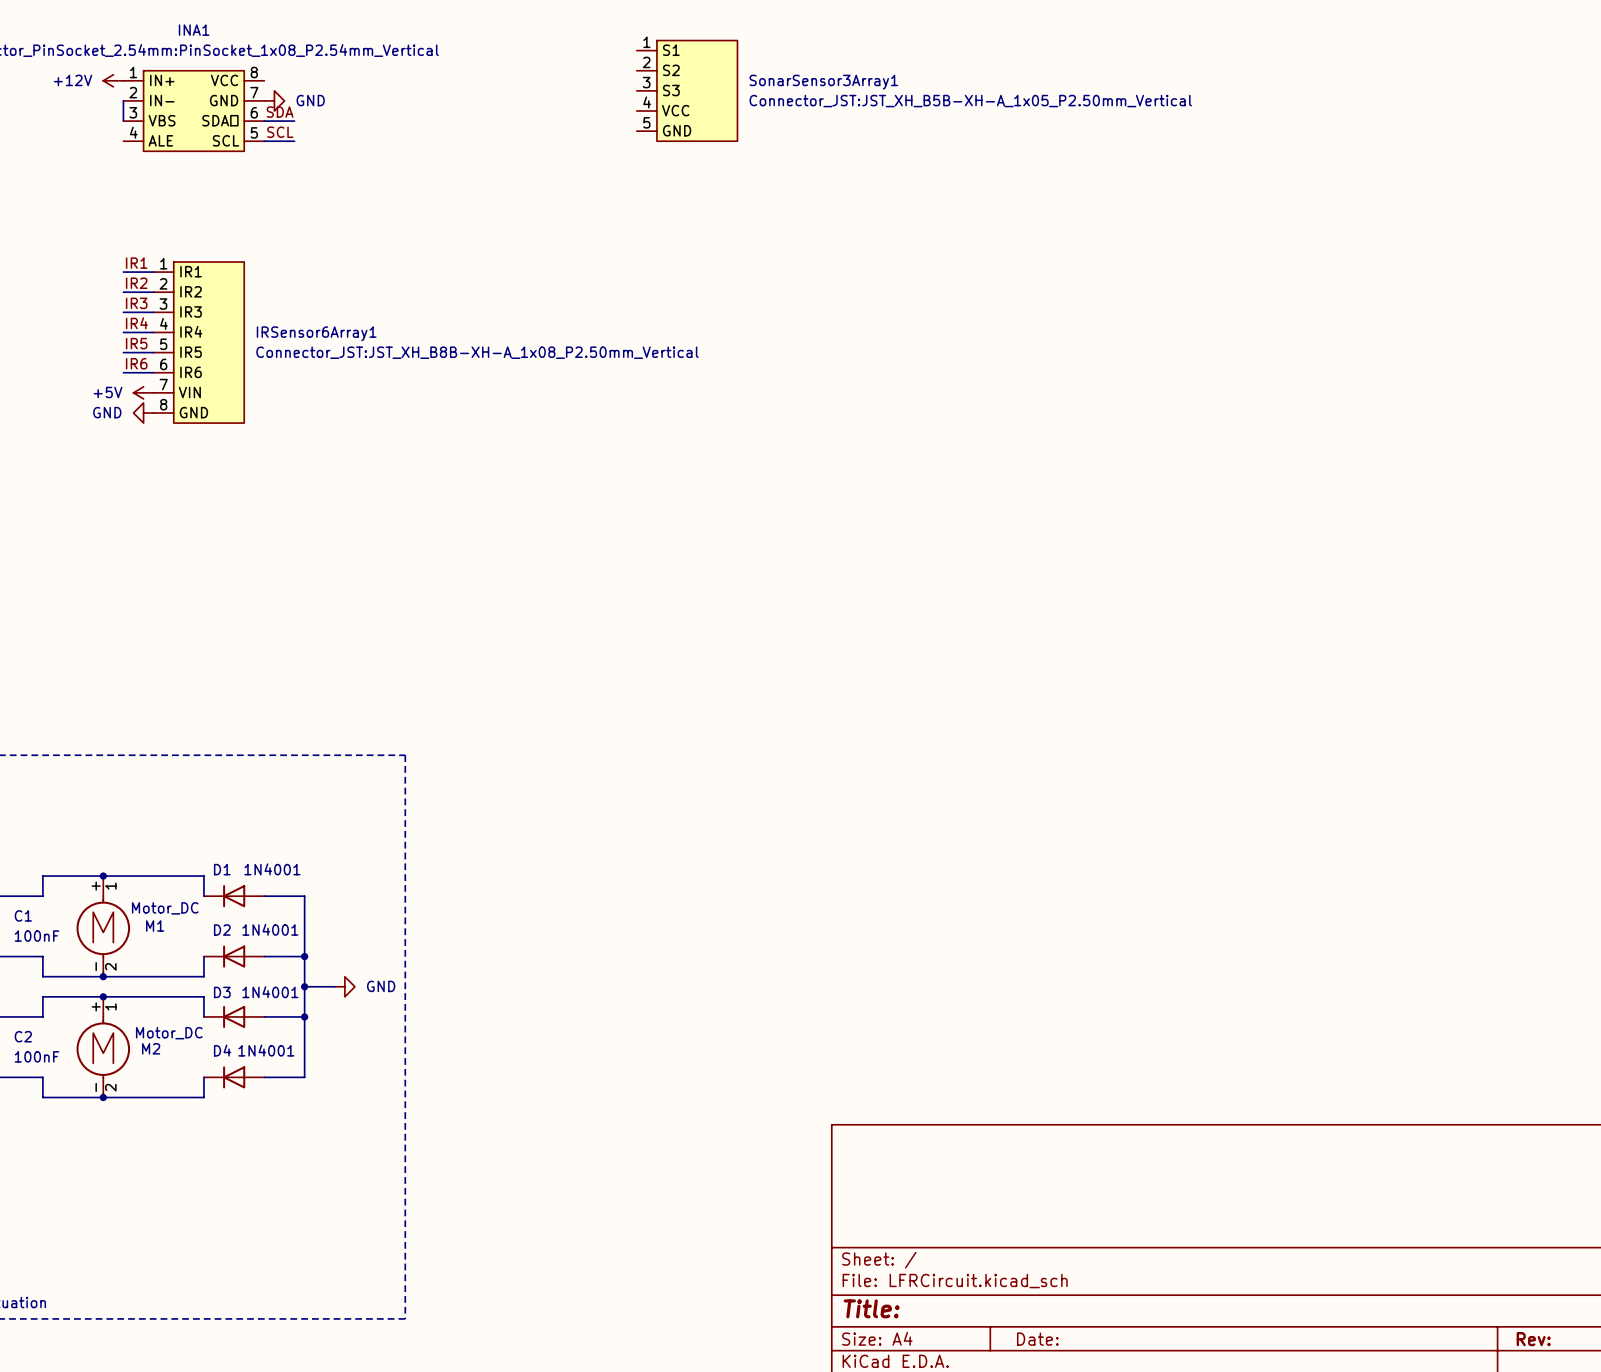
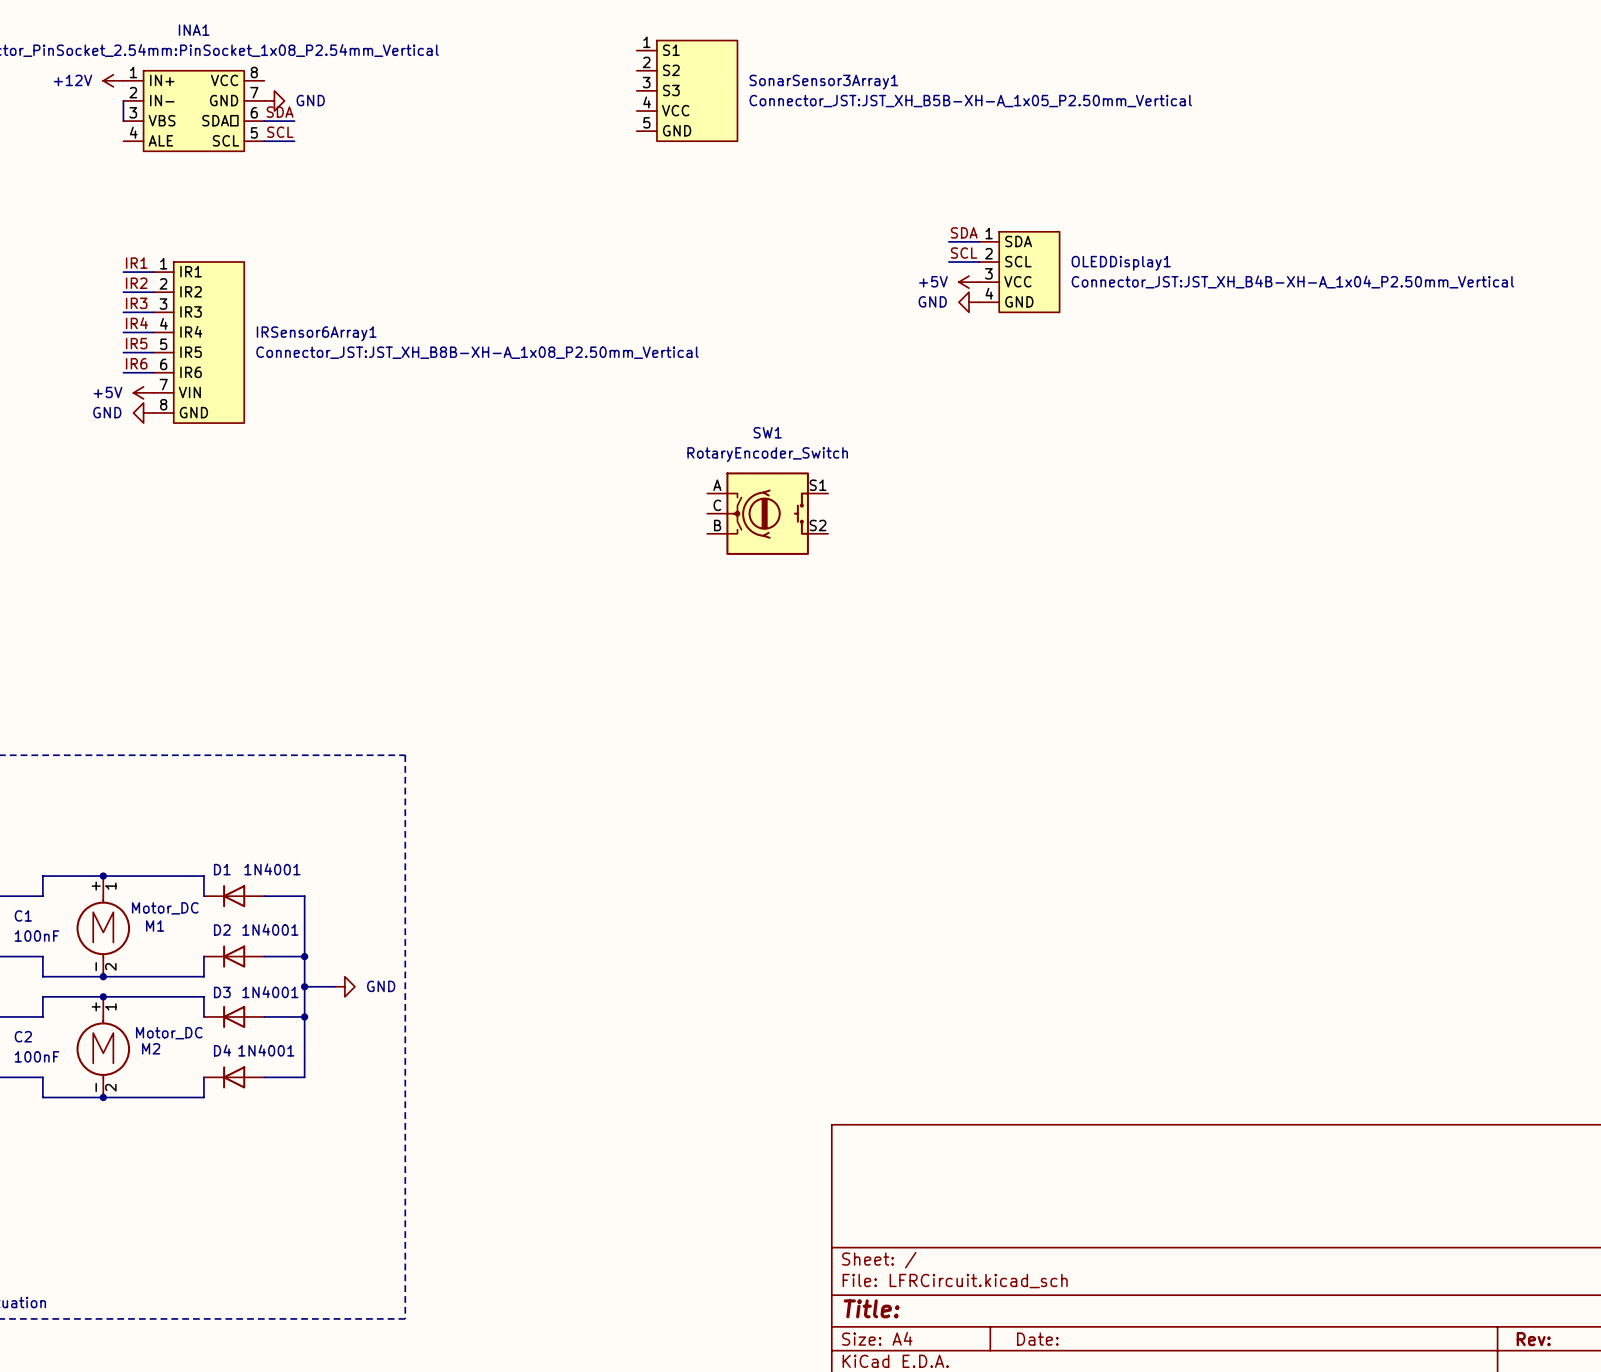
label: none -> SDA (964, 232)
wire: none -> (948, 241) (979, 241)
label: none -> SCL (964, 253)
wire: none -> (948, 262) (979, 262)
OLEDDisplay1: none -> (1019, 272)
power symbol: none -> +5V (968, 282)
power symbol: none -> GND (968, 302)
SW1: none -> RotaryEncoder_Switch (767, 513)

